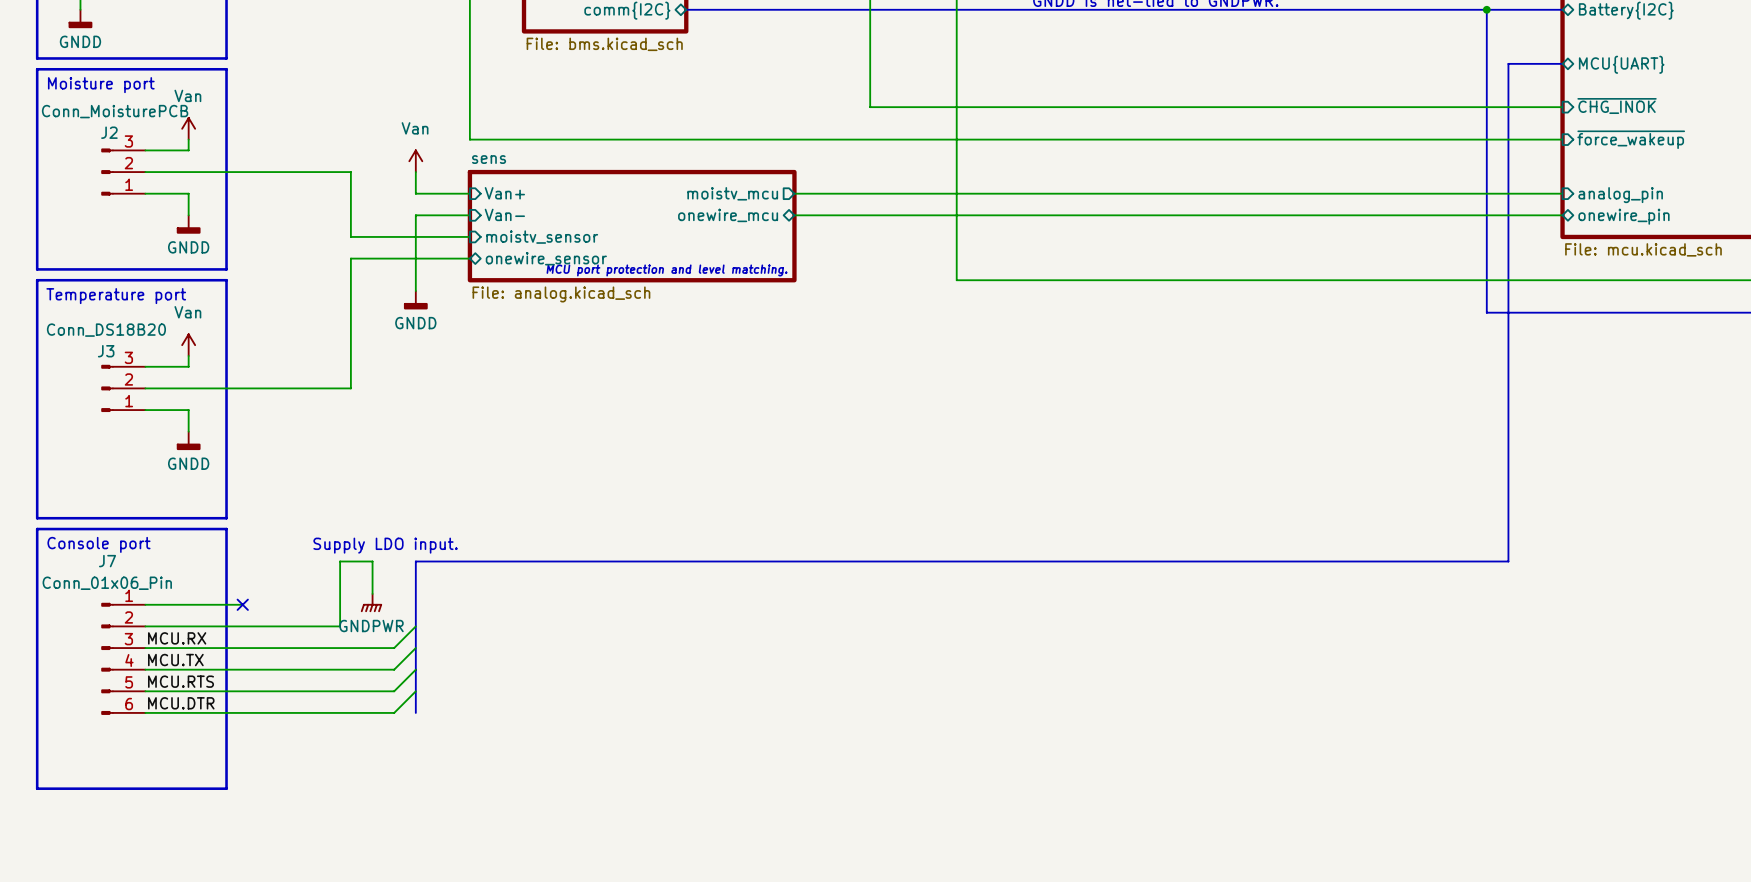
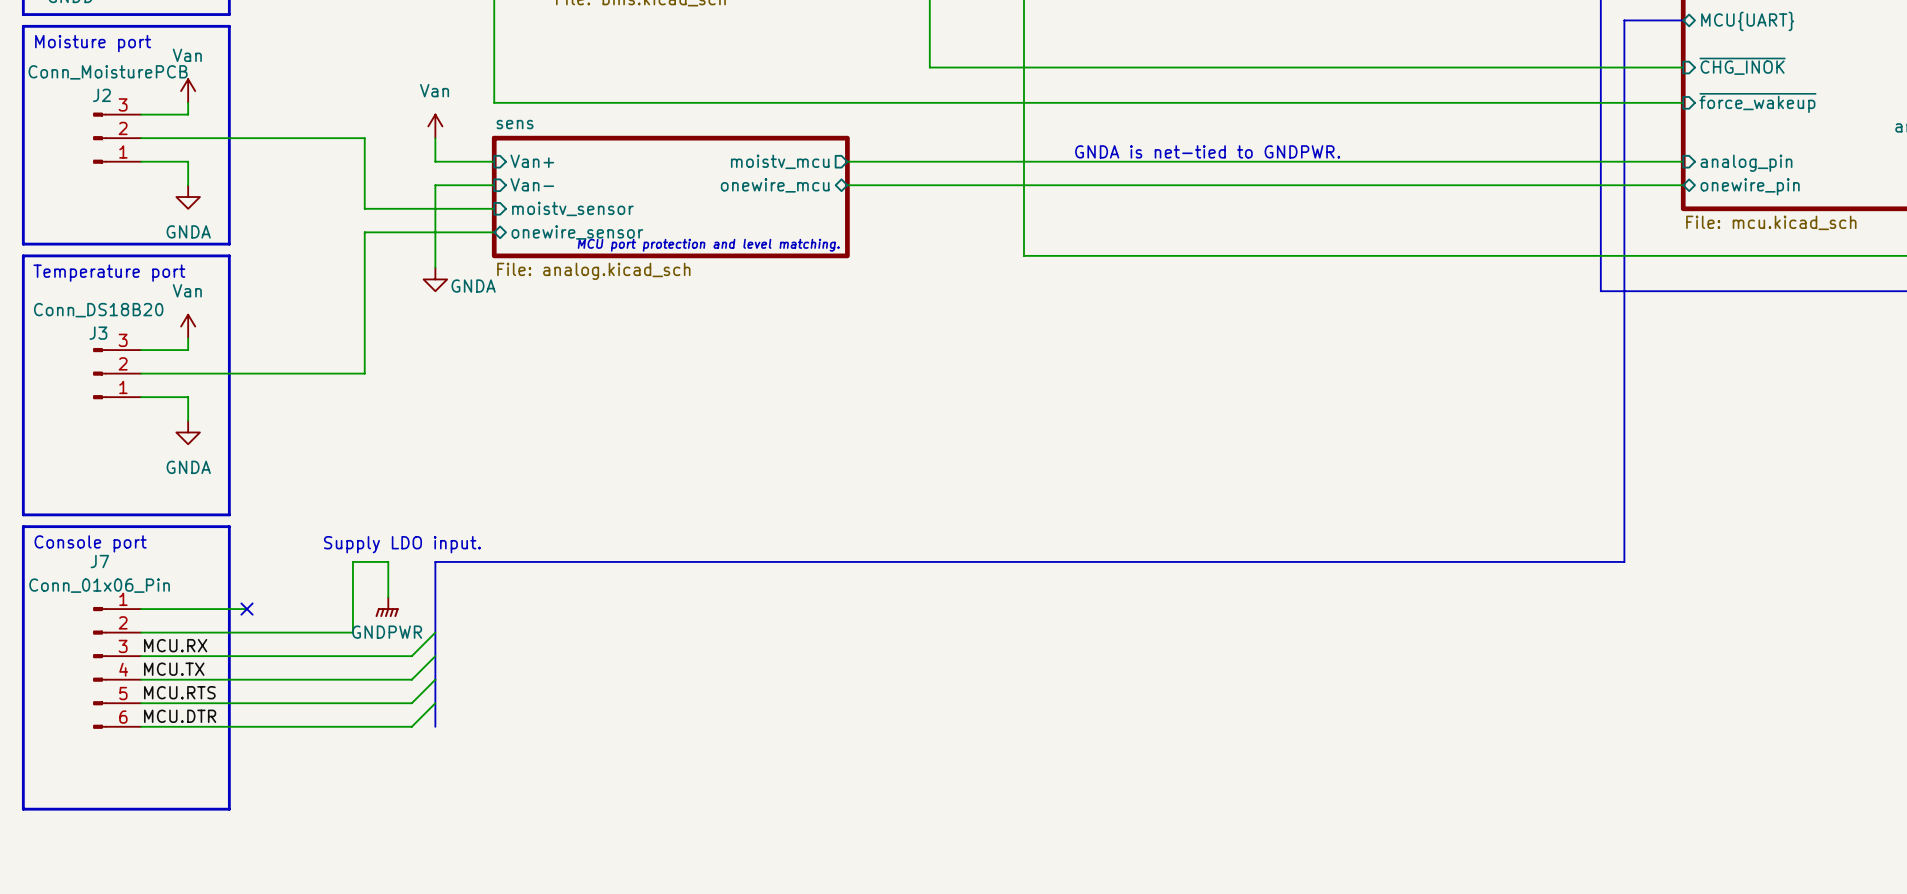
text: none -> GNDA is net-tied to GNDPWR. (1207, 151)
power symbol: GNDD (188, 224) -> GNDA (188, 197)
power symbol: GNDD (415, 300) -> GNDA (435, 279)
power symbol: GNDD (188, 440) -> GNDA (188, 432)

